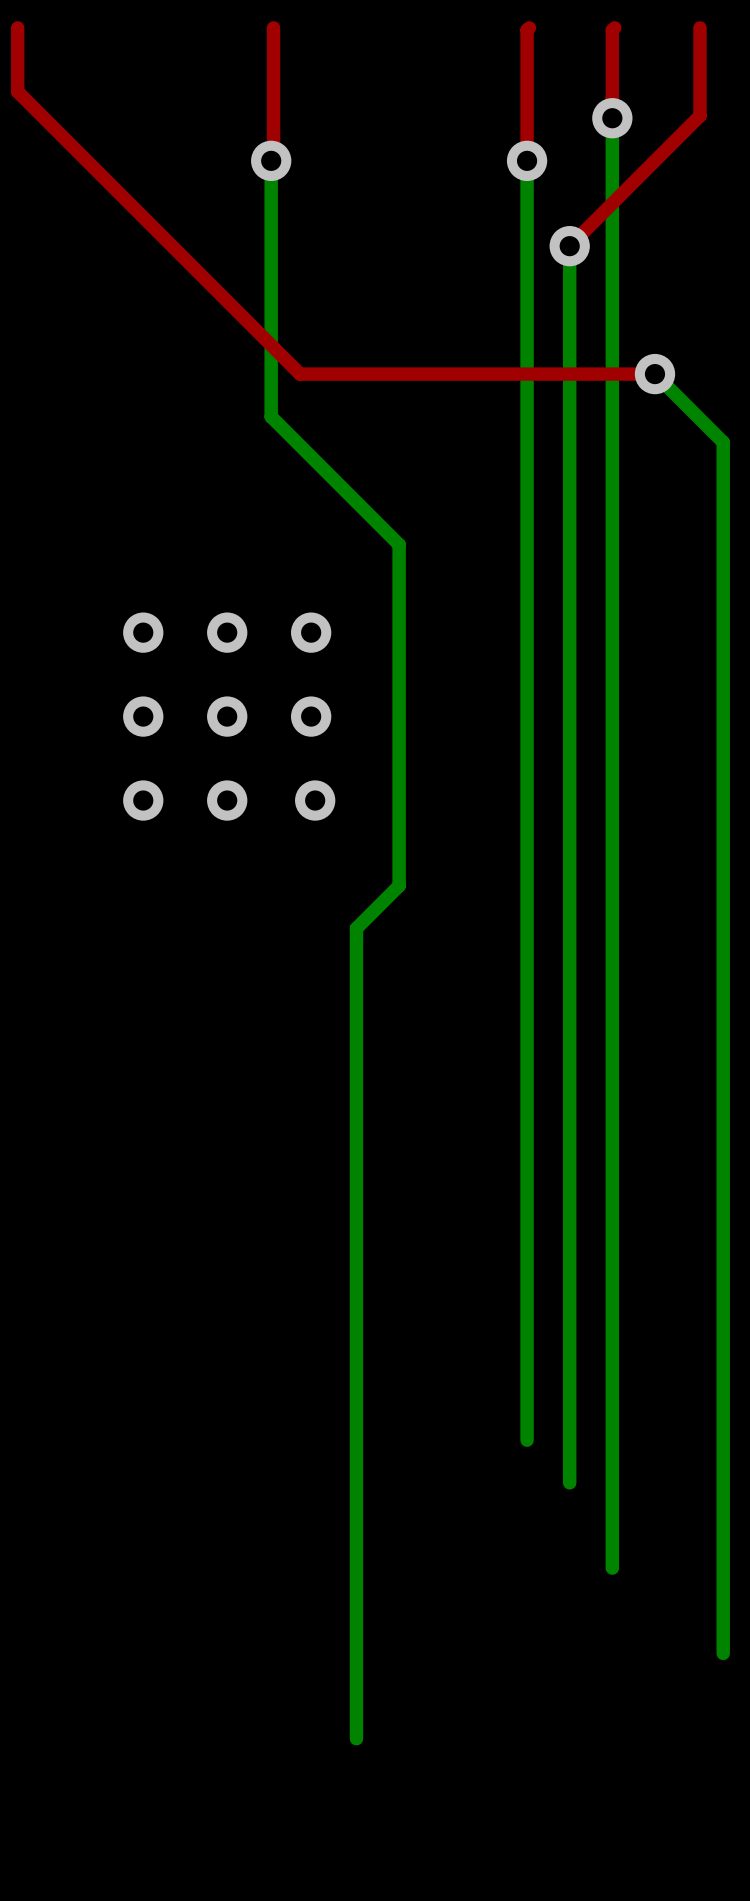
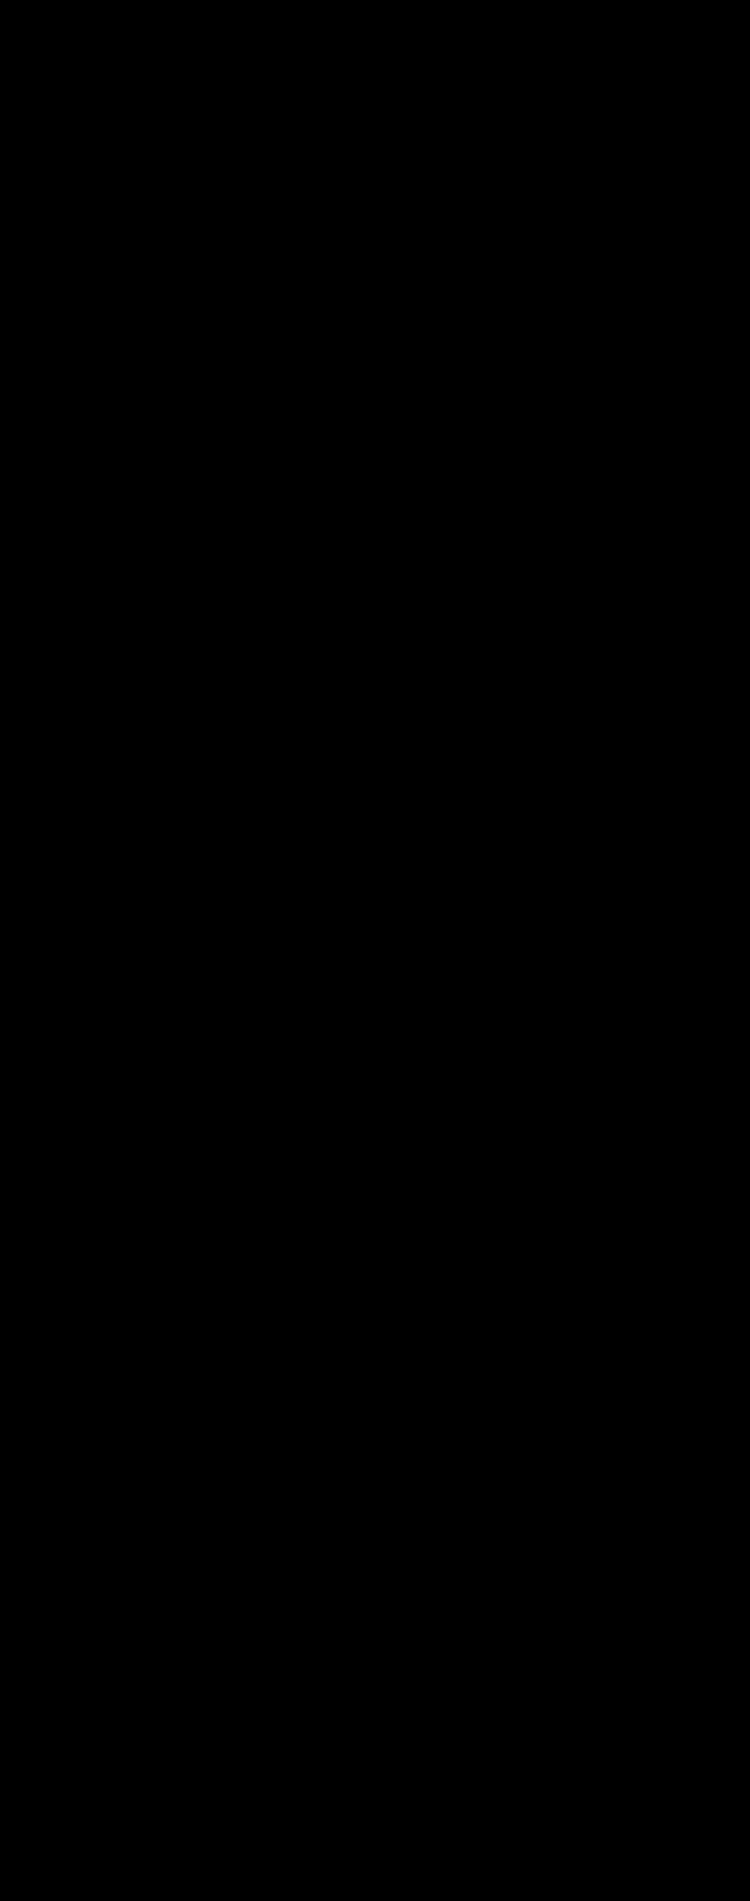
top track: (17, 27) (17, 91) (300, 374) (654, 374) -> none
top track: (273, 27) (273, 158) (271, 160) -> none
top track: (529, 27) (527, 30) (527, 160) -> none
top track: (614, 27) (612, 30) (612, 118) -> none
top track: (699, 27) (699, 115) (569, 246) -> none
bottom track: (612, 96) (612, 1568) -> none
via: (612, 118) -> none
bottom track: (271, 160) (271, 416) (399, 544) (399, 885) (356, 928) (356, 1738) -> none
via: (271, 160) -> none
bottom track: (527, 160) (527, 1440) -> none
via: (527, 160) -> none
bottom track: (569, 246) (569, 1482) -> none
via: (569, 246) -> none
bottom track: (654, 374) (723, 442) (723, 1653) -> none
via: (654, 374) -> none
via: (143, 632) -> none
via: (227, 632) -> none
via: (311, 632) -> none
via: (143, 716) -> none
via: (227, 716) -> none
via: (311, 716) -> none
via: (143, 800) -> none
via: (227, 800) -> none
via: (315, 800) -> none

